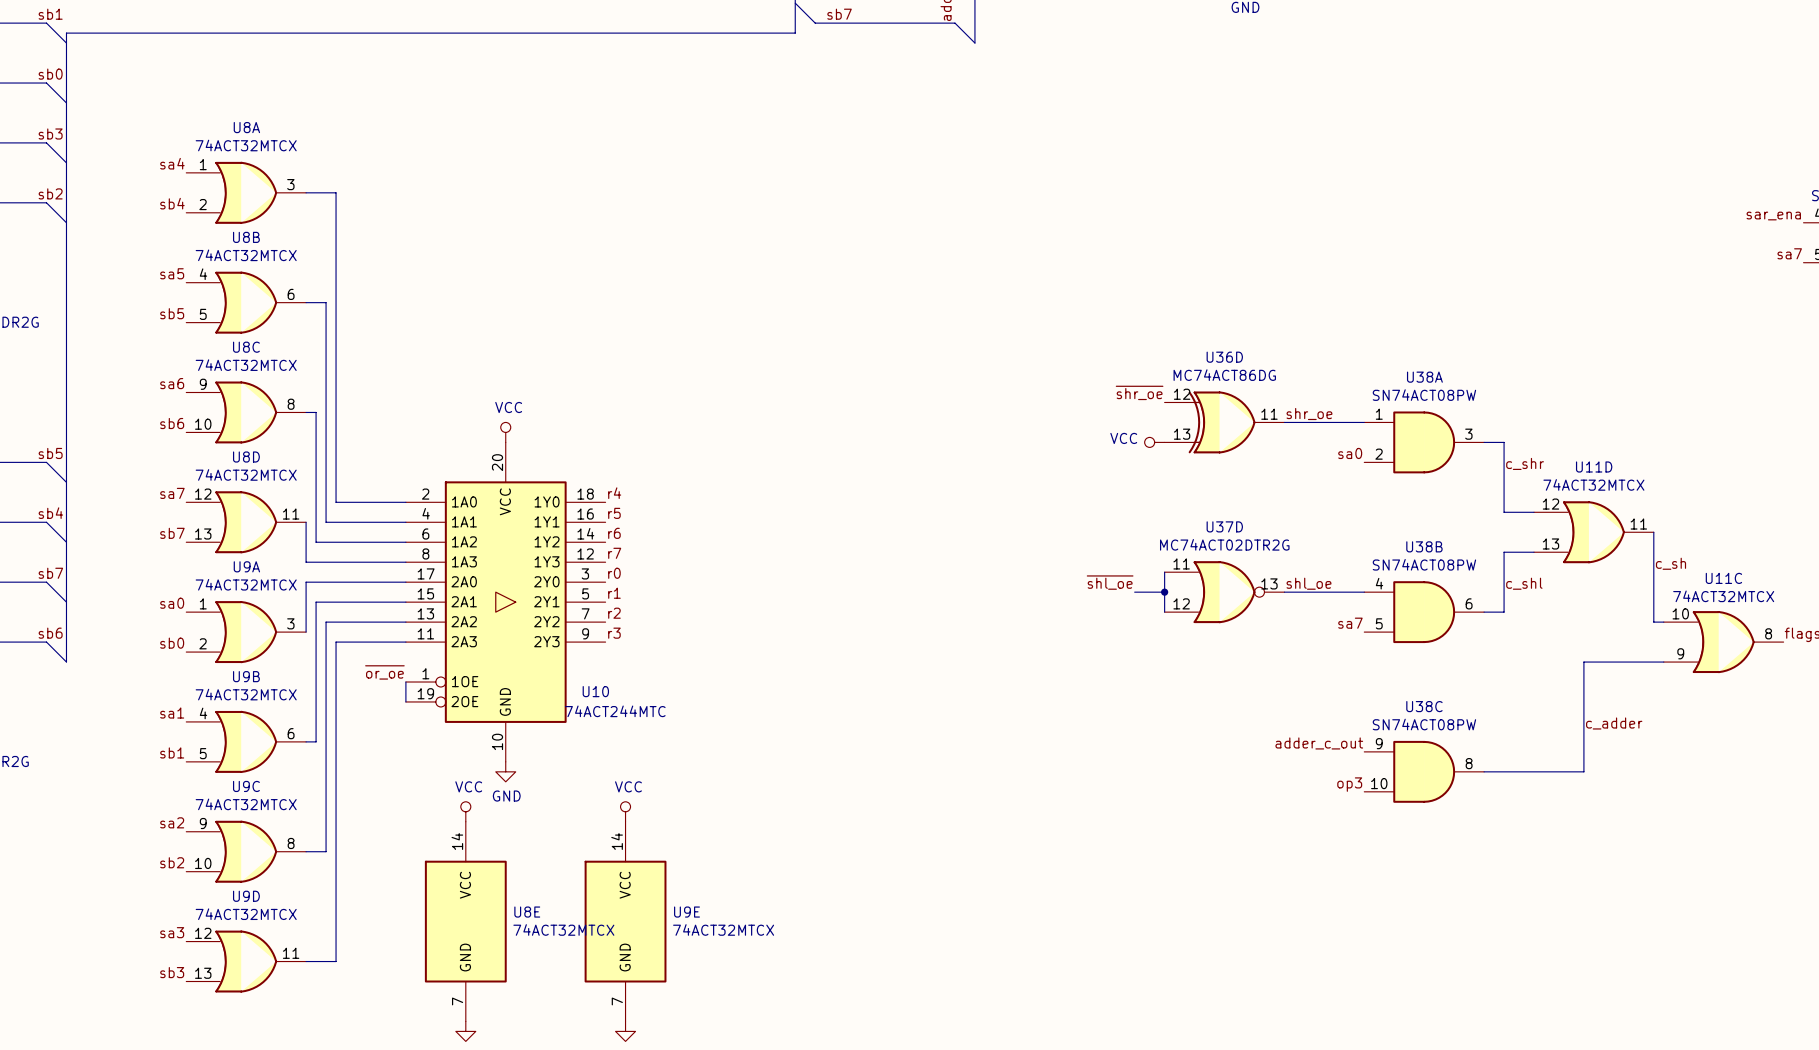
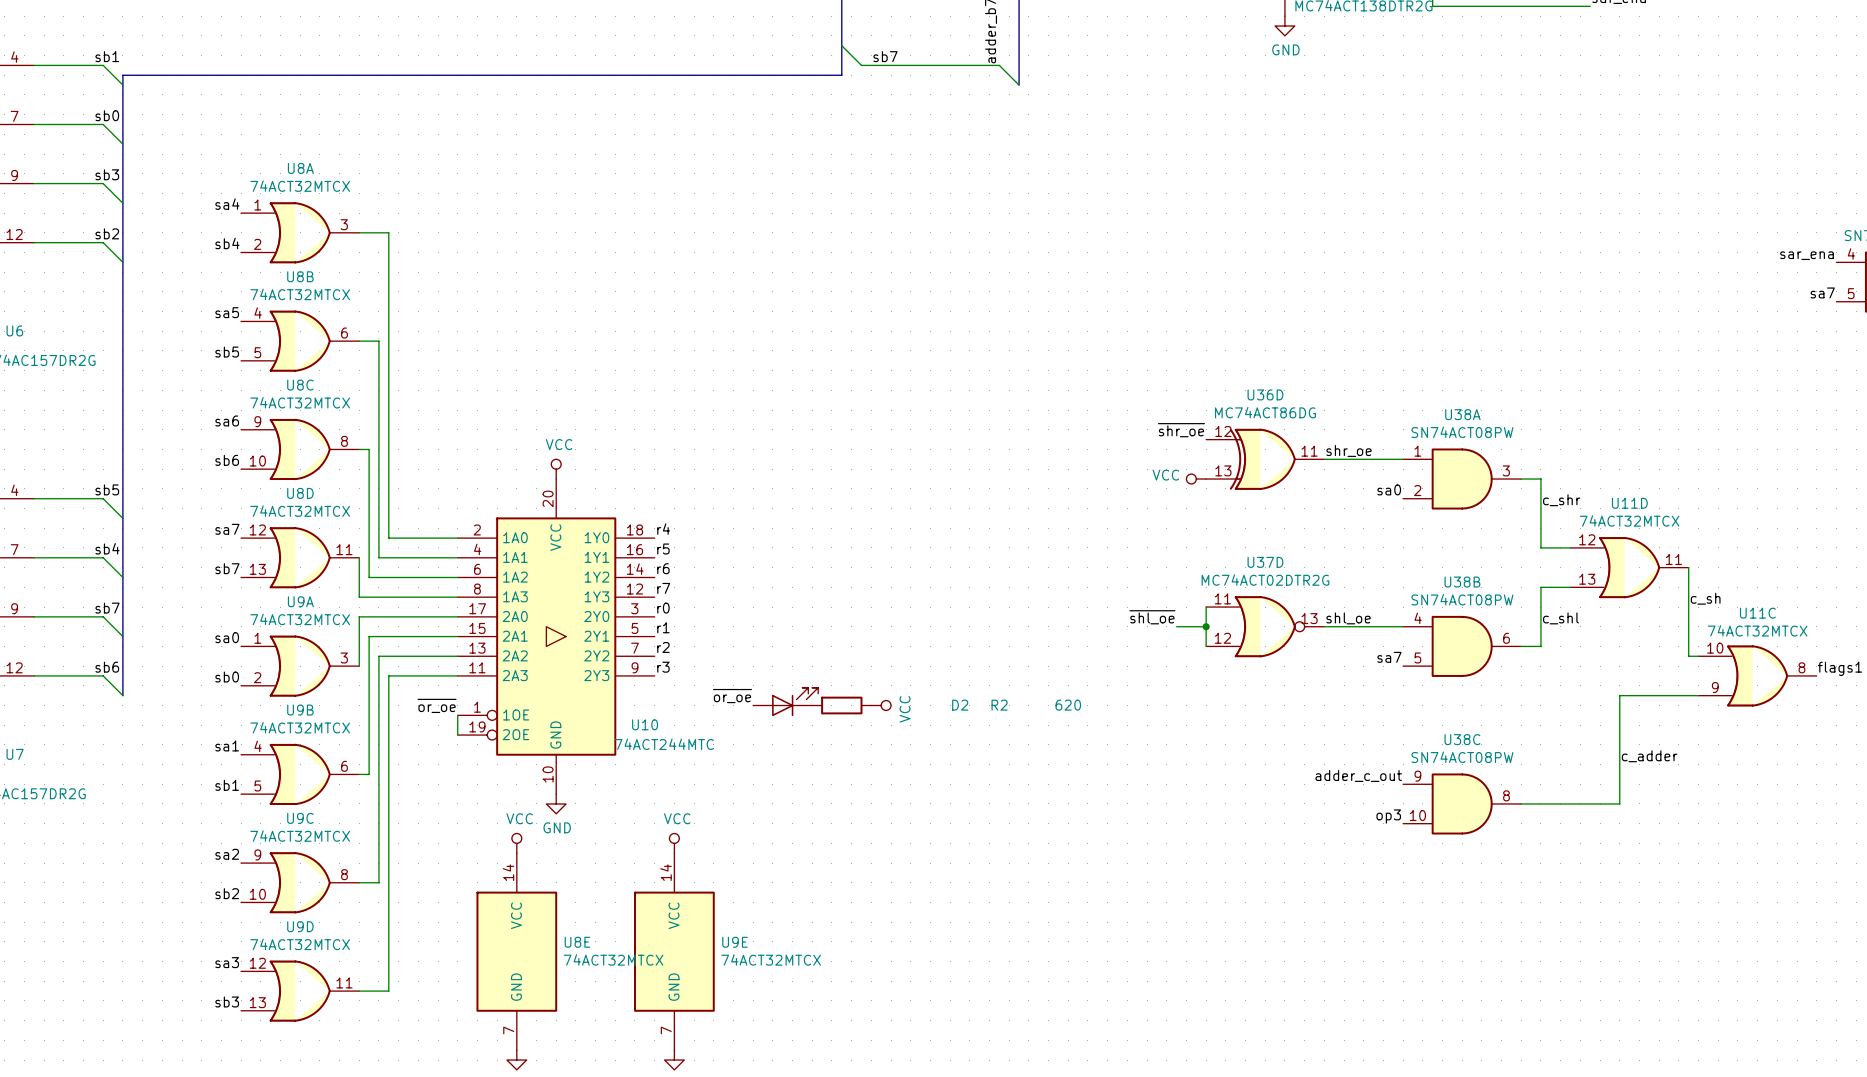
label: none -> ~{or_oe} (732, 696)
D2: none -> (785, 701)
R2: none -> 620 (841, 705)
power symbol: none -> VCC (881, 705)

